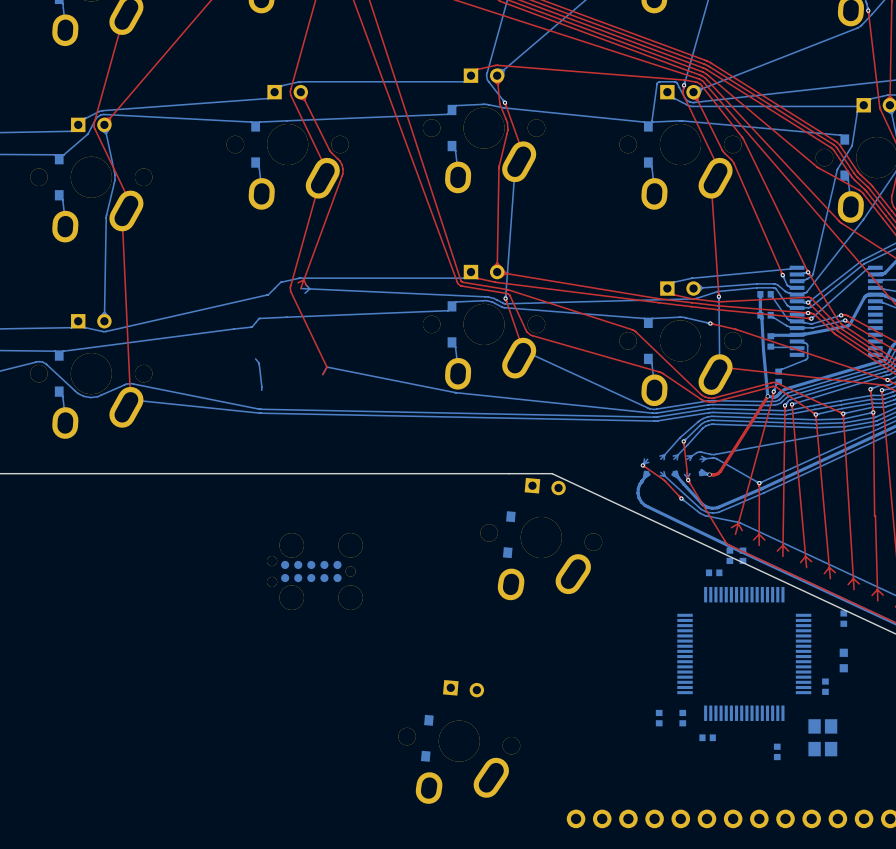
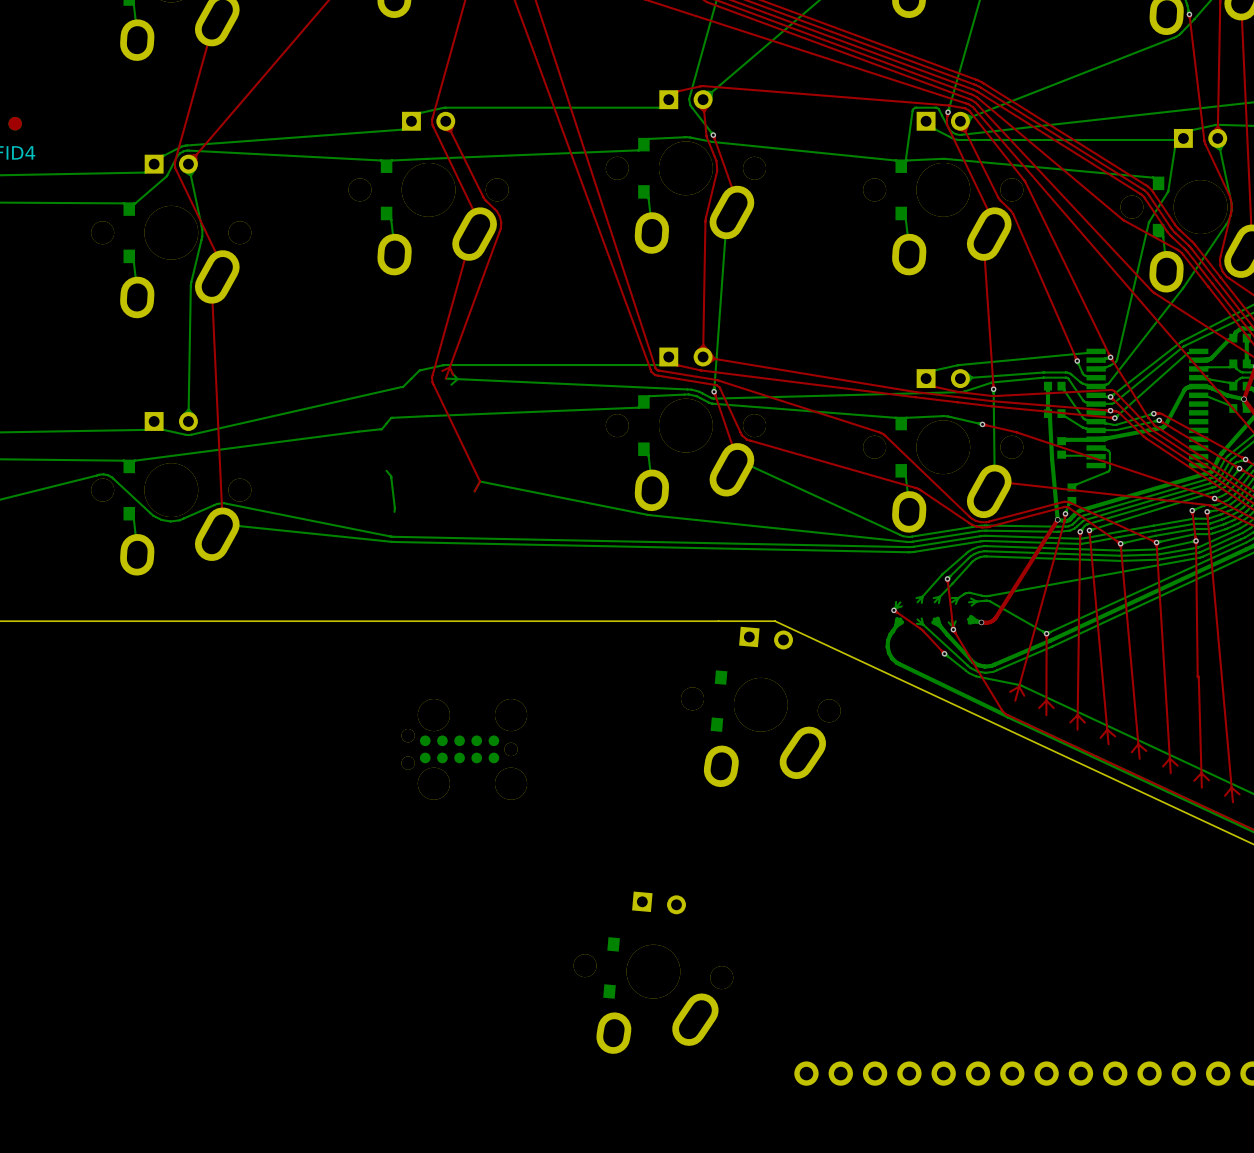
part: (729, 555) -> none
part: (742, 555) -> none
part: (714, 572) -> none
part: (843, 618) -> none
part: (744, 653) -> none
part: (843, 660) -> none
part: (825, 686) -> none
part: (659, 718) -> none
part: (682, 718) -> none
part: (707, 737) -> none
part: (822, 737) -> none
part: (777, 751) -> none

